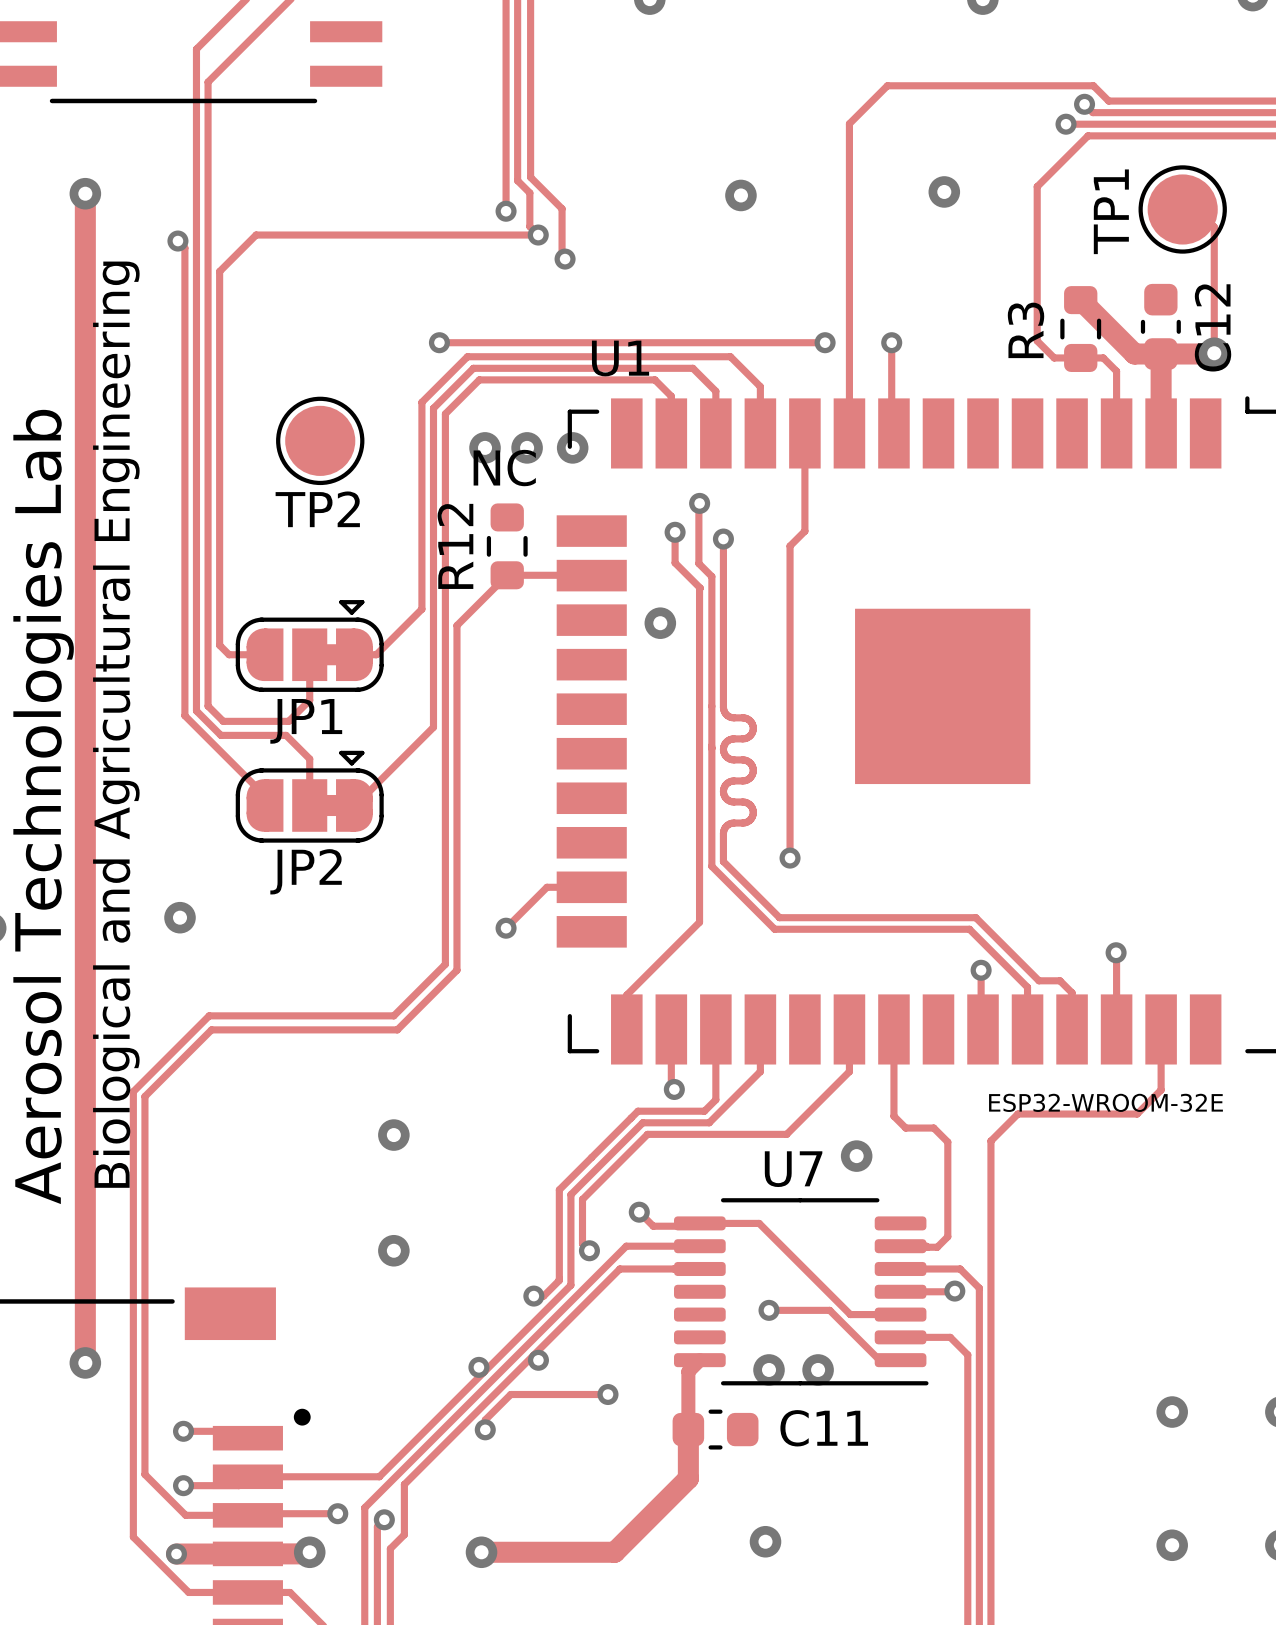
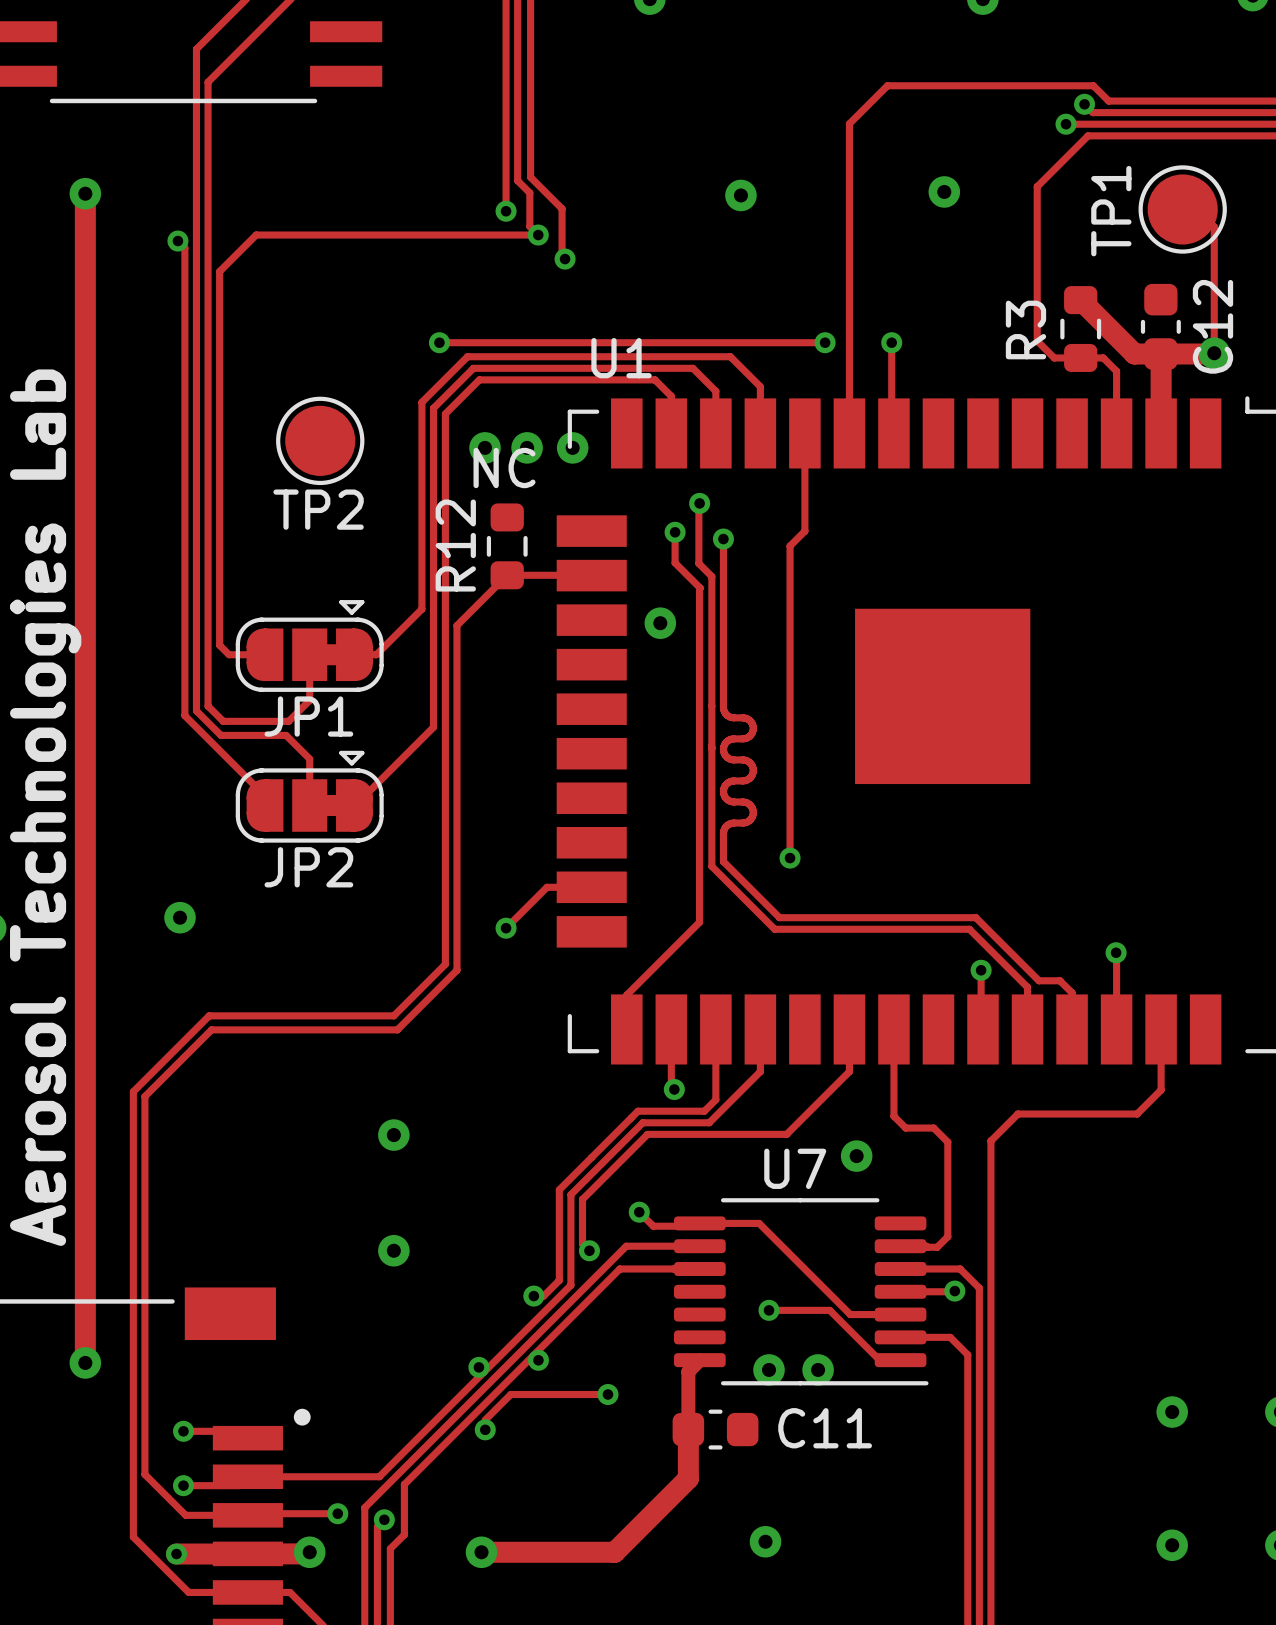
text: Biological and Agricultural Engineering (116, 724) -> none
text: ESP32-WROOM-32E (1105, 1102) -> none

